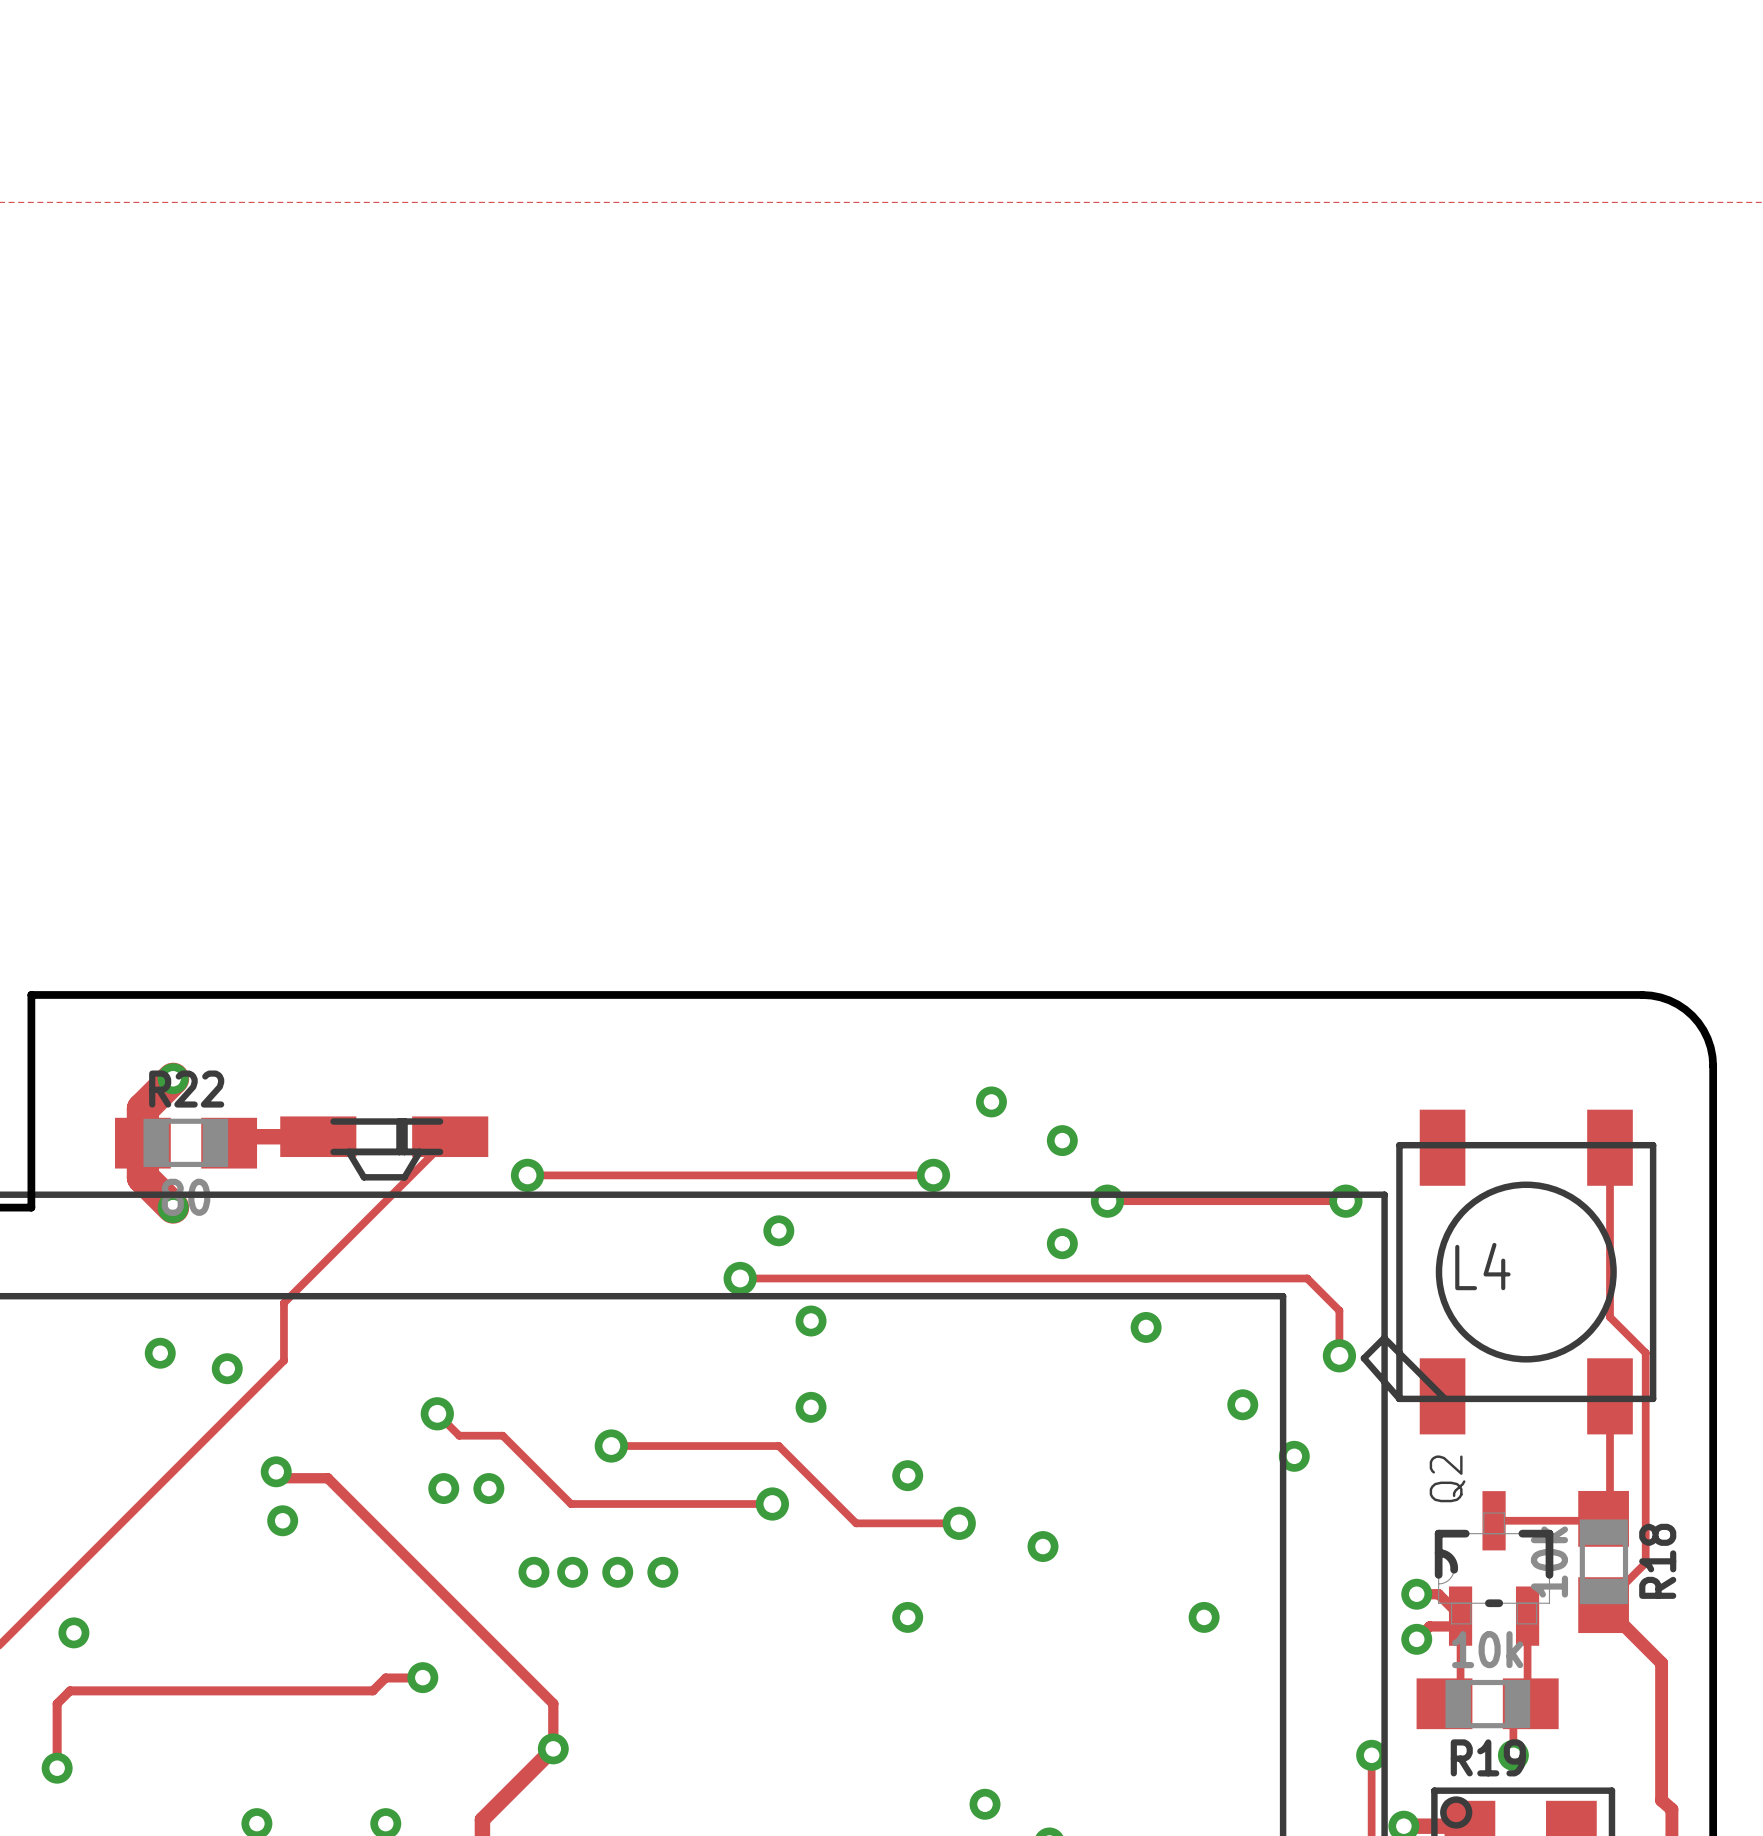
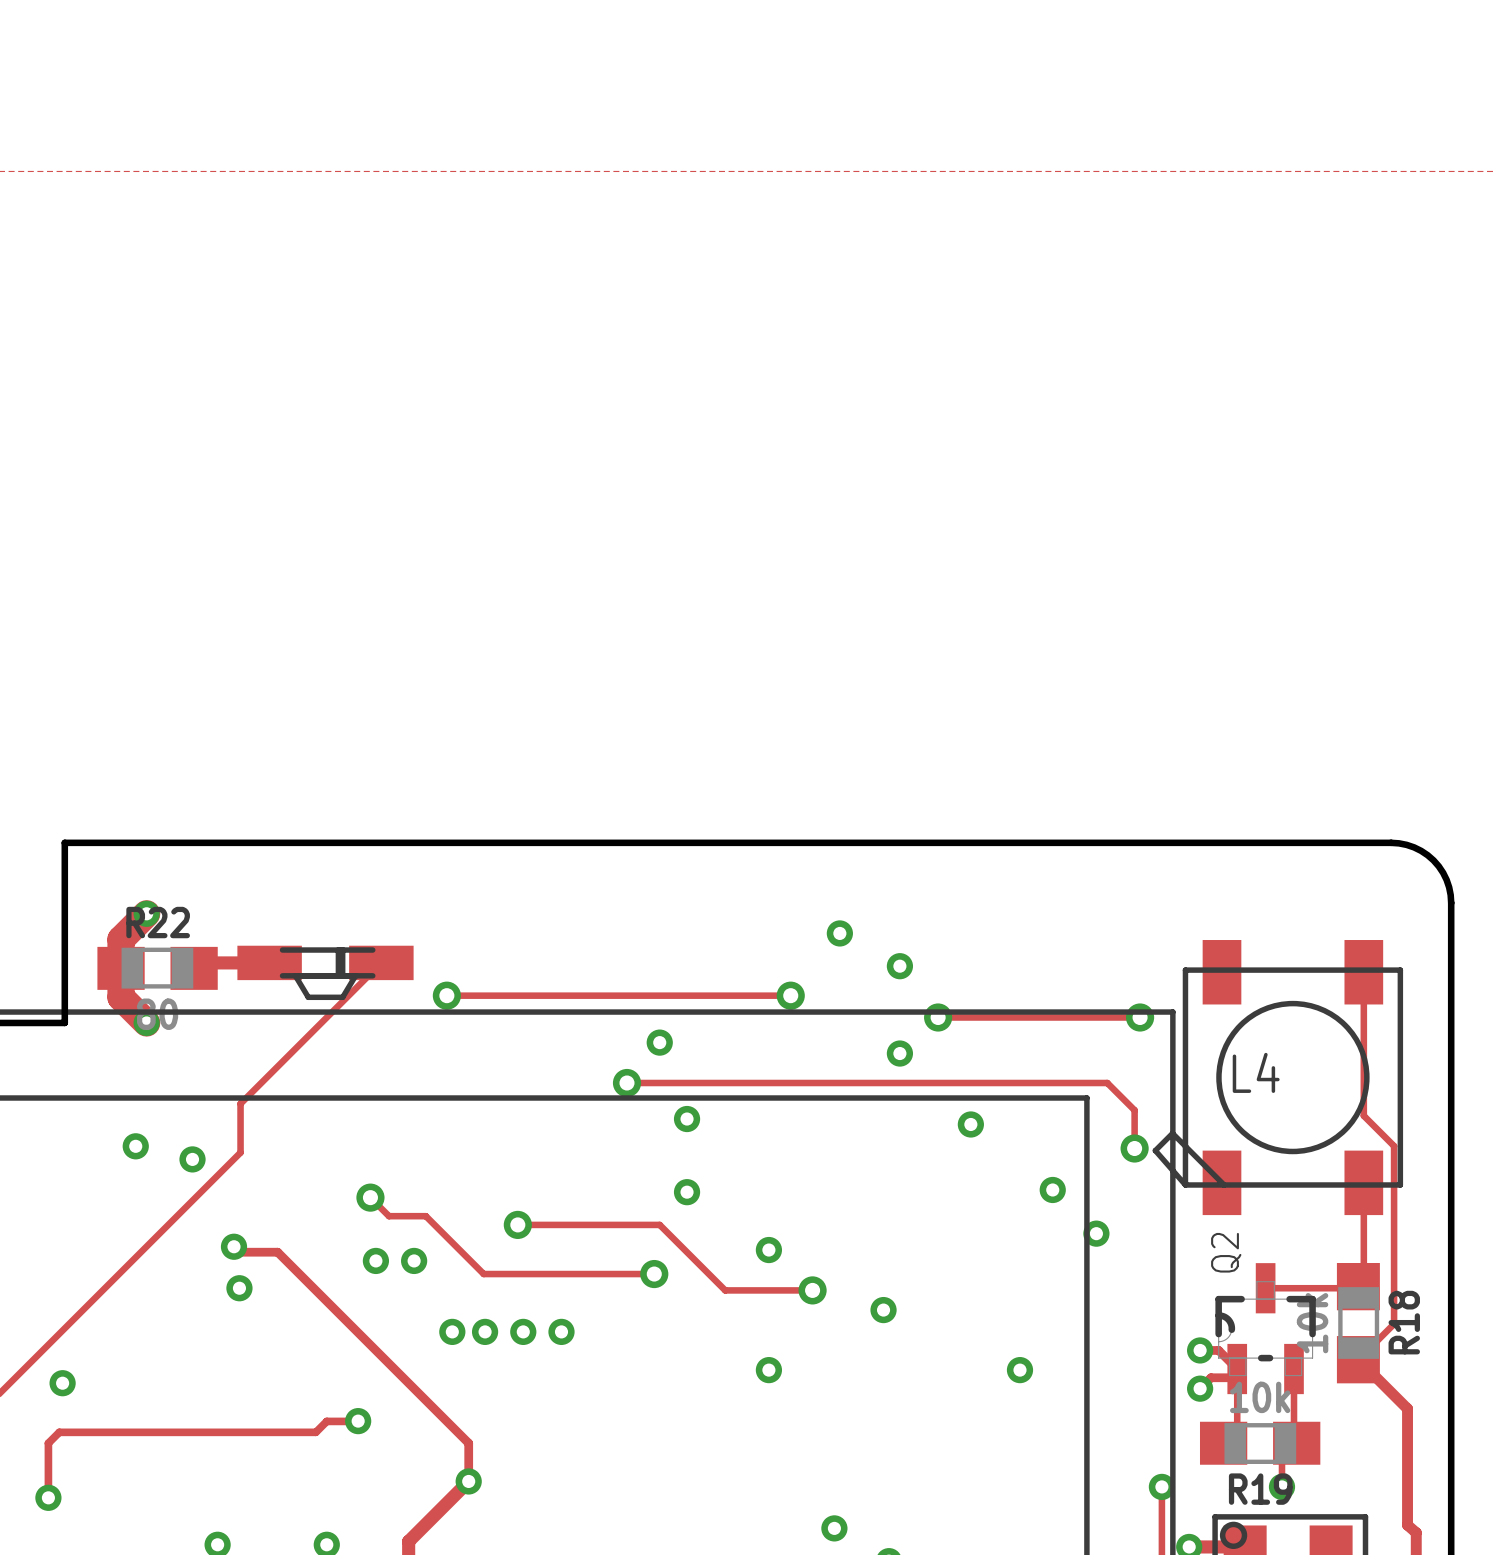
board edge: (76, 994) (31, 994) (31, 1207) -> (64, 842) (64, 1022) (26, 1022)

